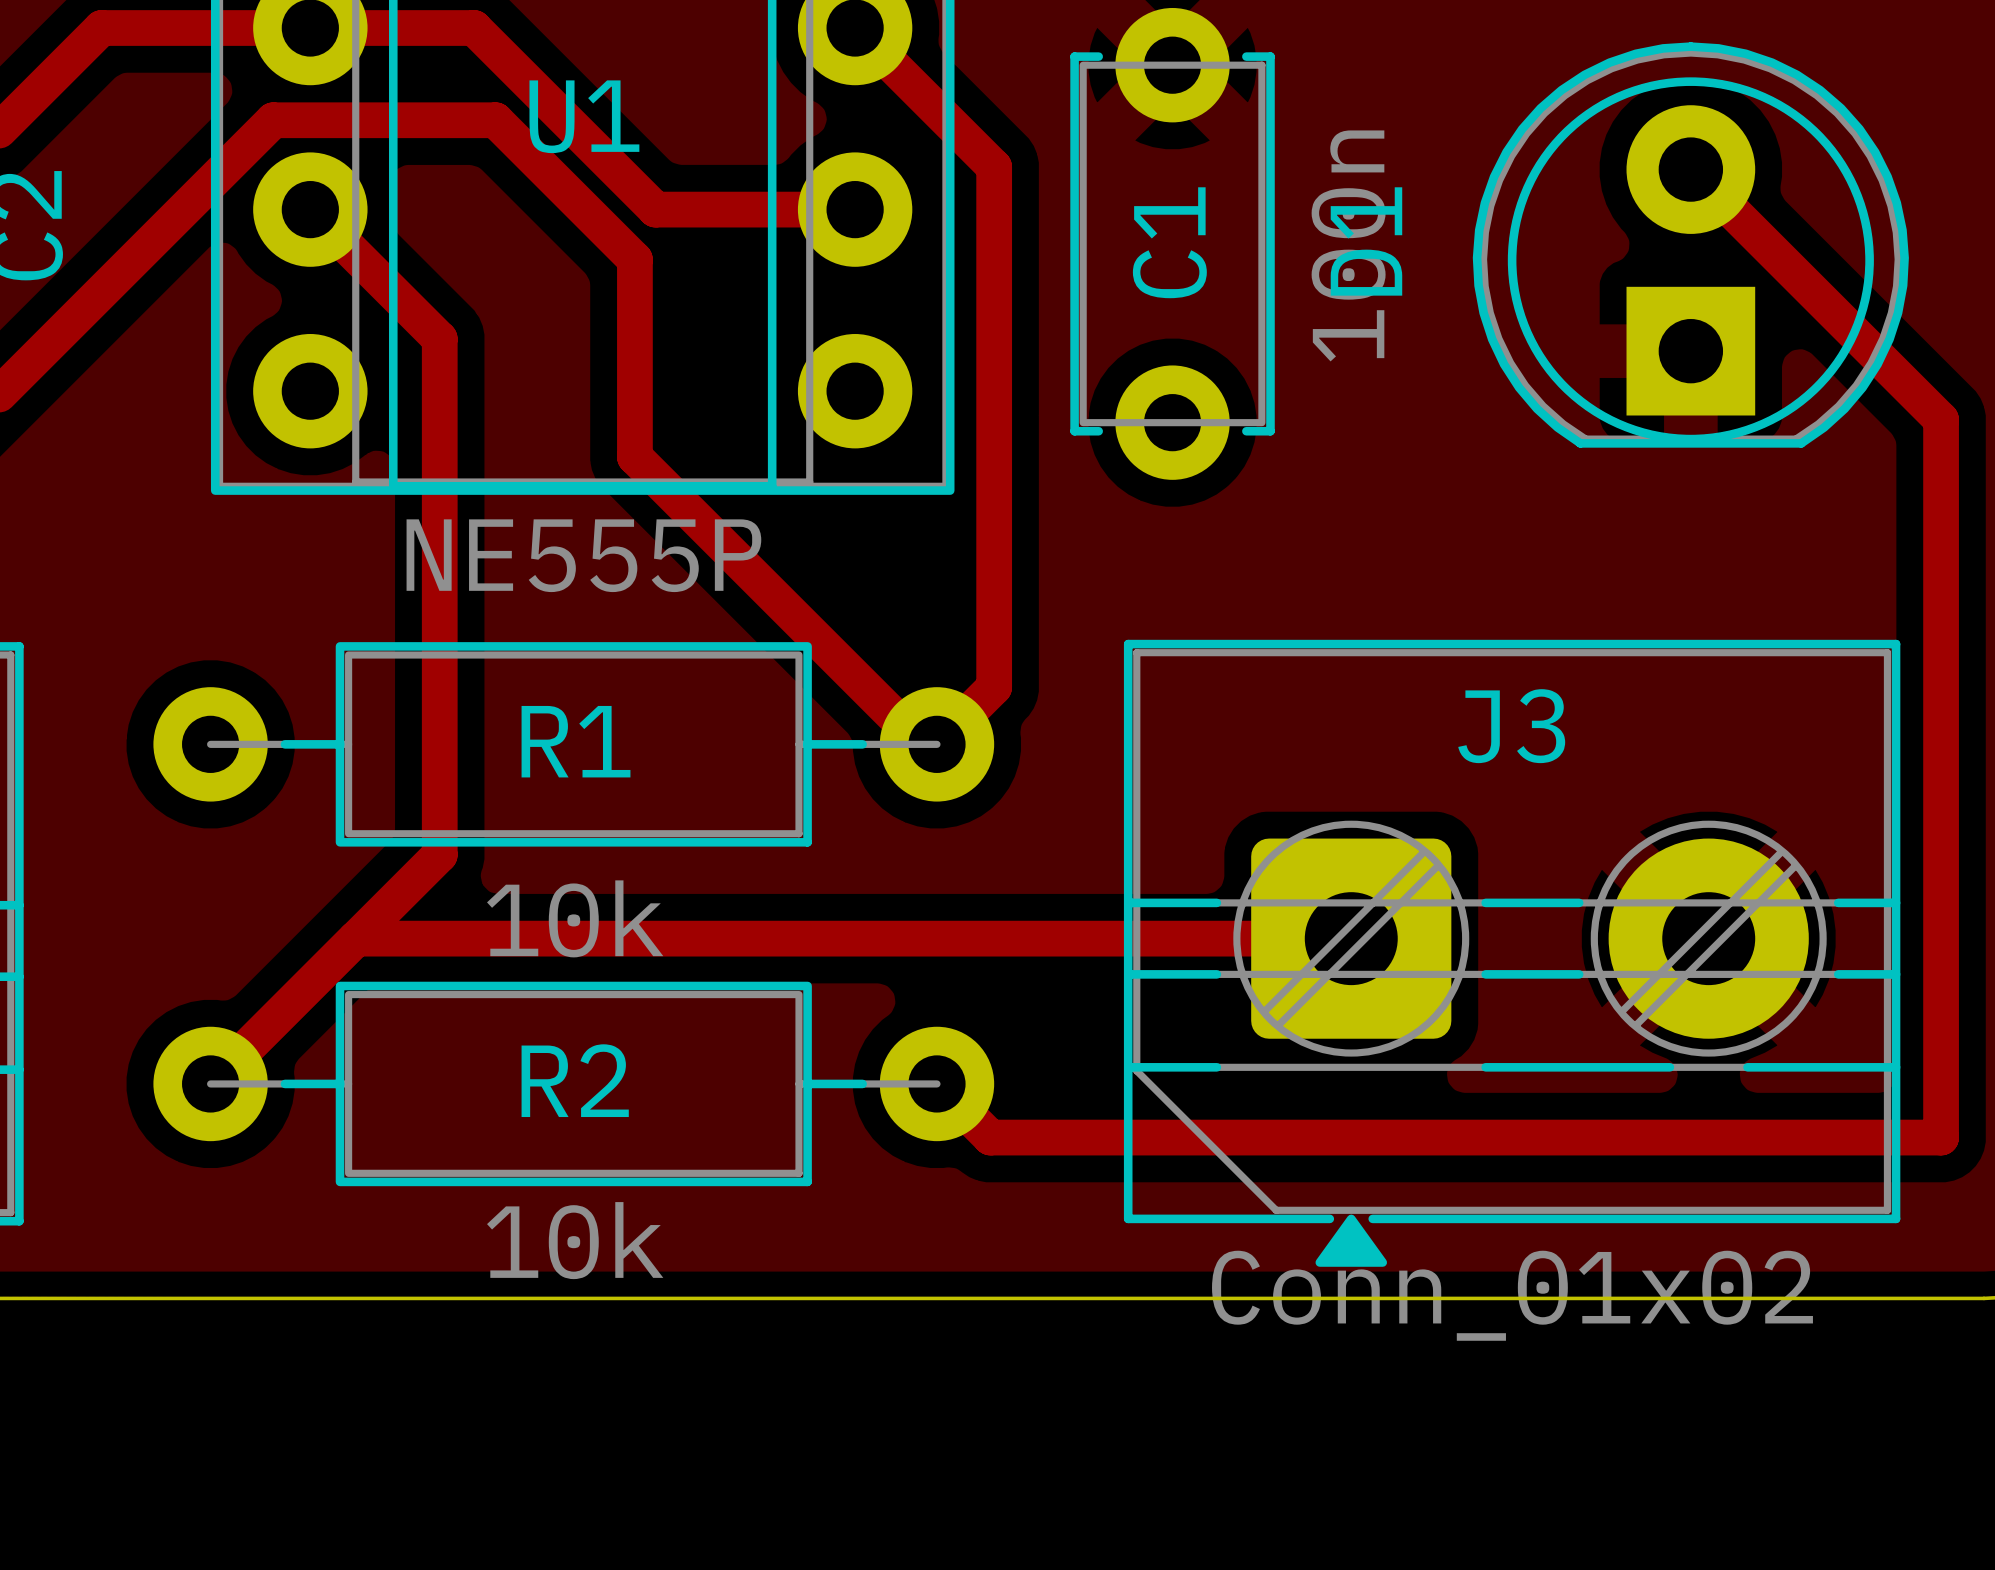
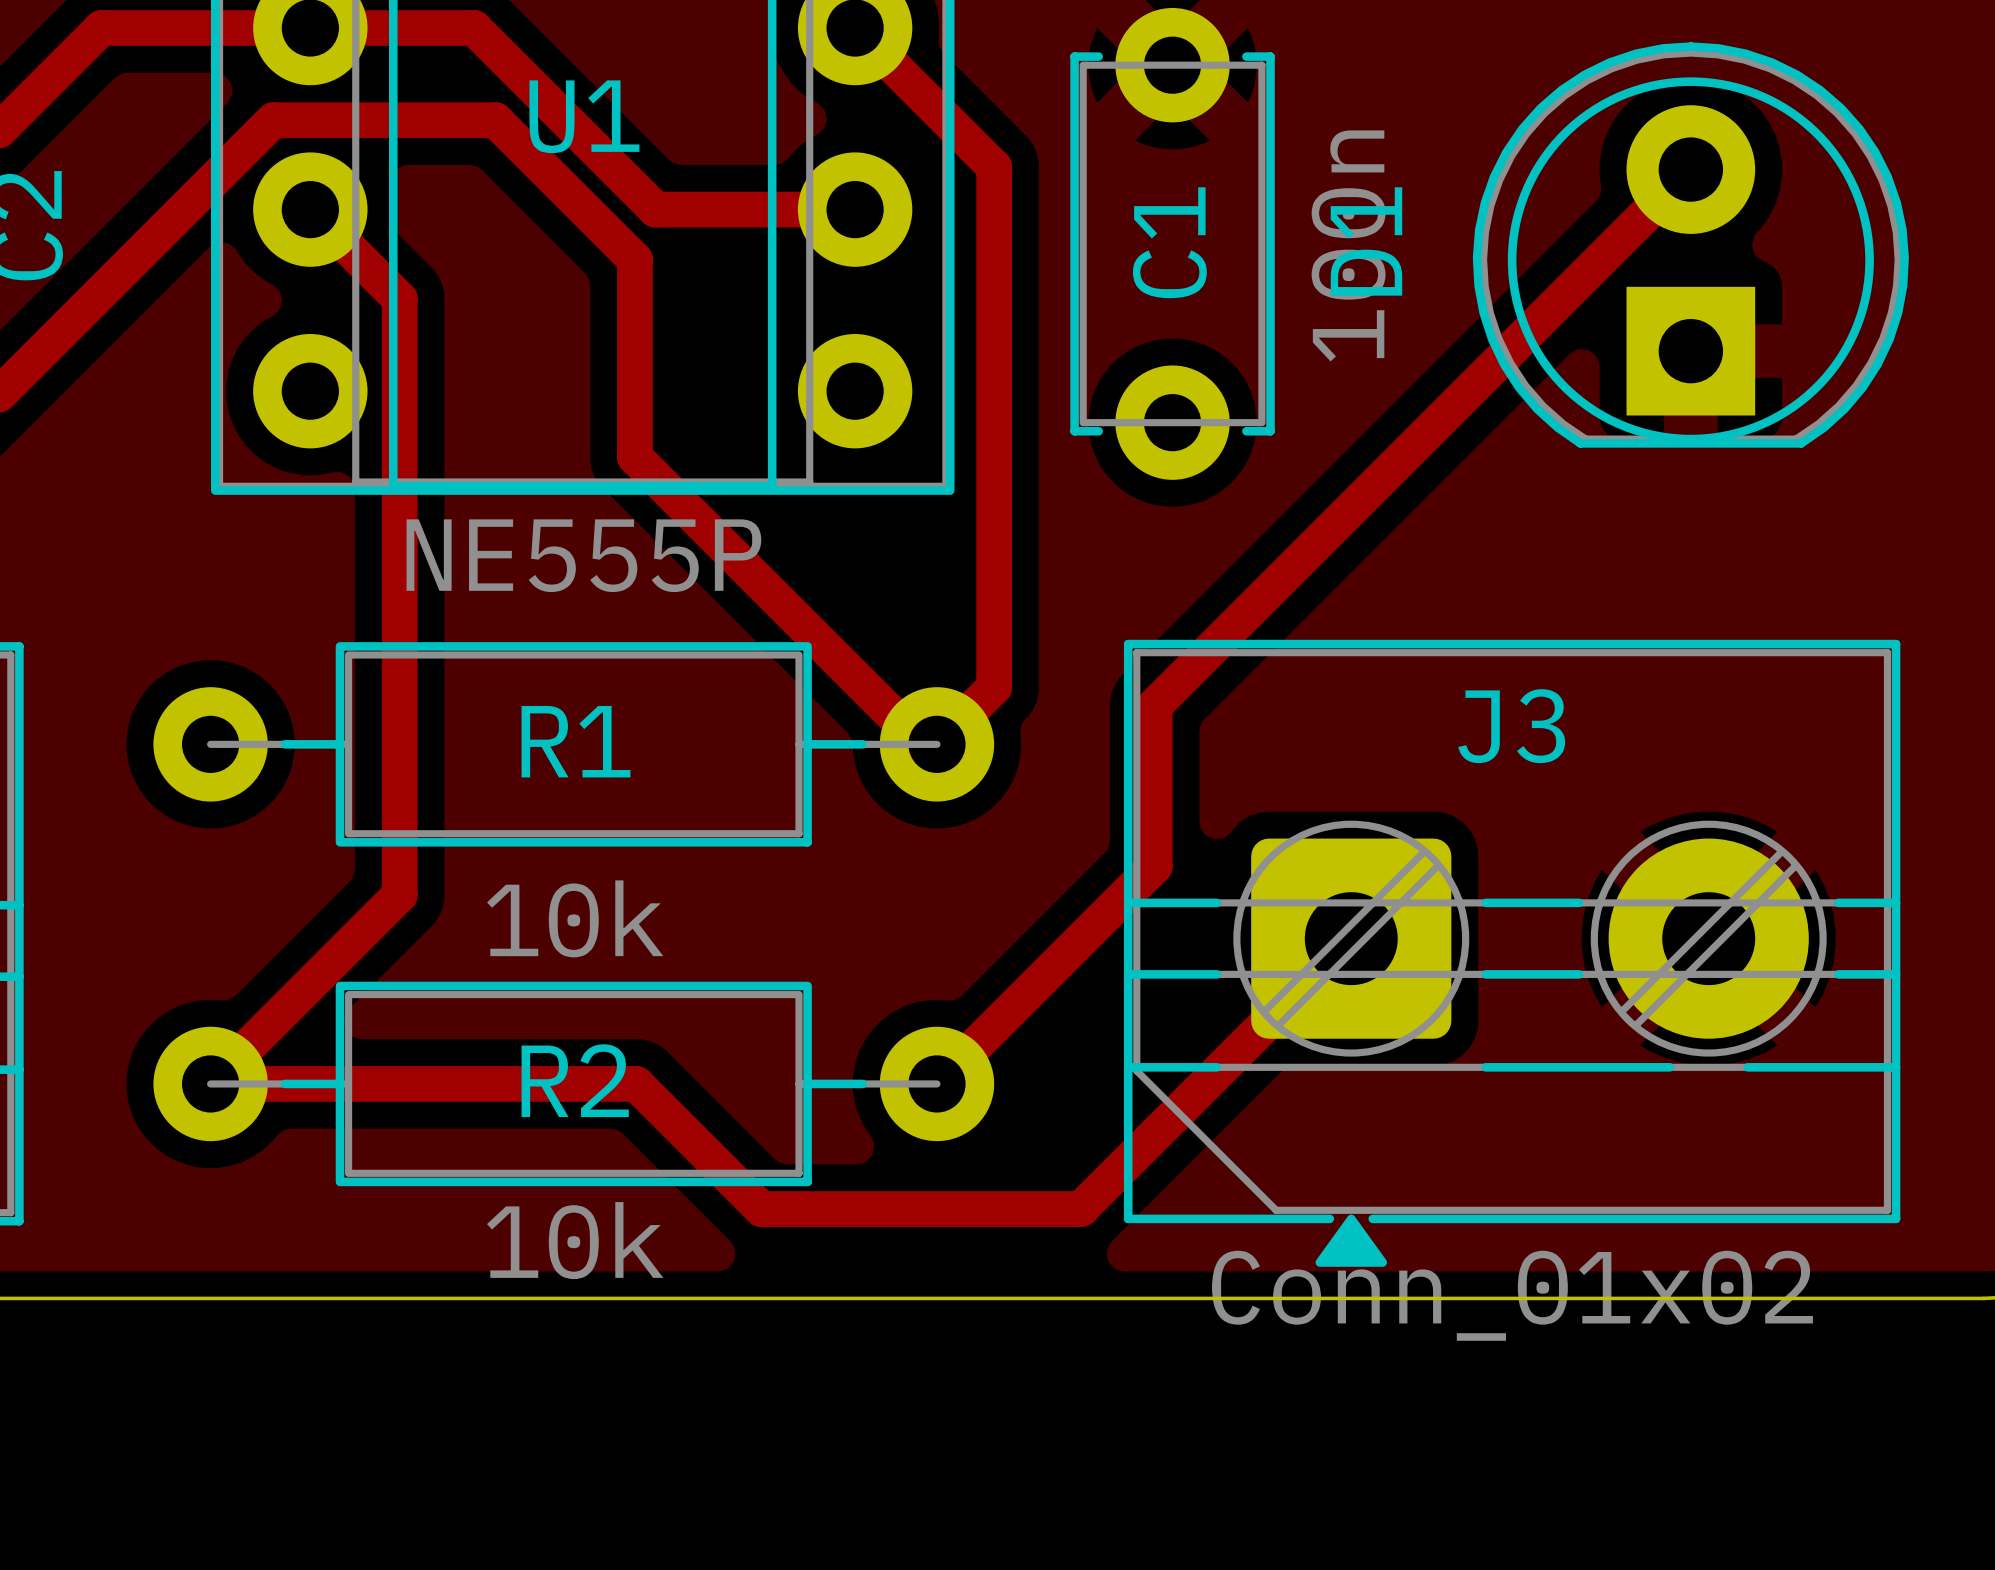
track: (1690, 169) (1941, 419) (1941, 1137) (990, 1137) (936, 1083) -> (1690, 169) (1154, 705) (1154, 866) (936, 1083)
track: (399, 298) (439, 339) (439, 854) (399, 894) -> (399, 298) (399, 894)
track: (355, 938) (1351, 938) -> (210, 1083) (636, 1083) (761, 1209) (1080, 1209) (1351, 938)

